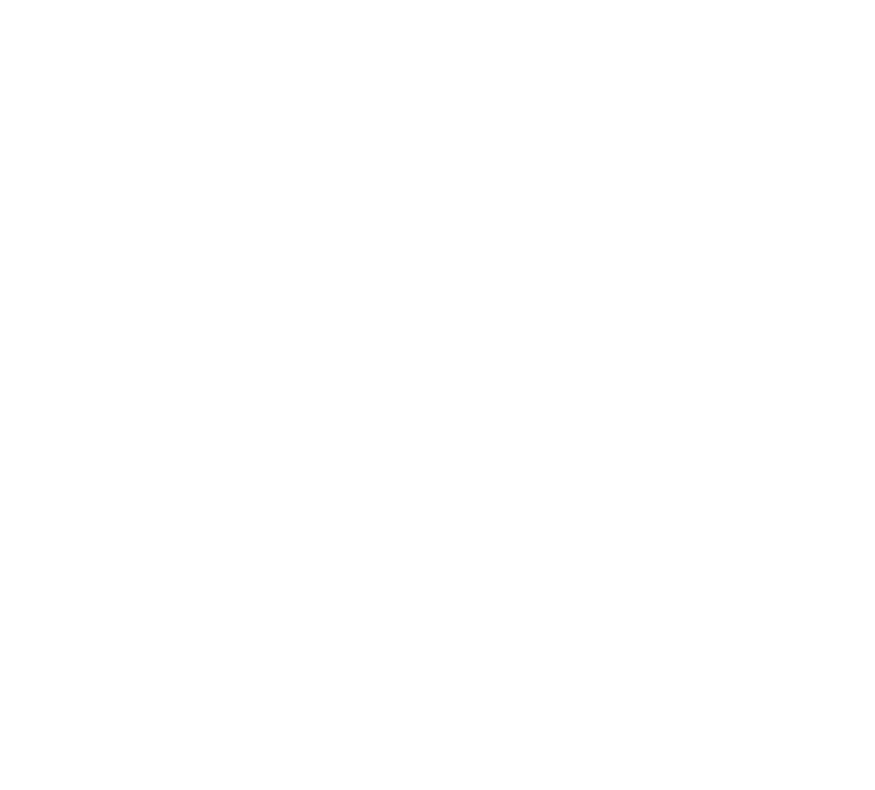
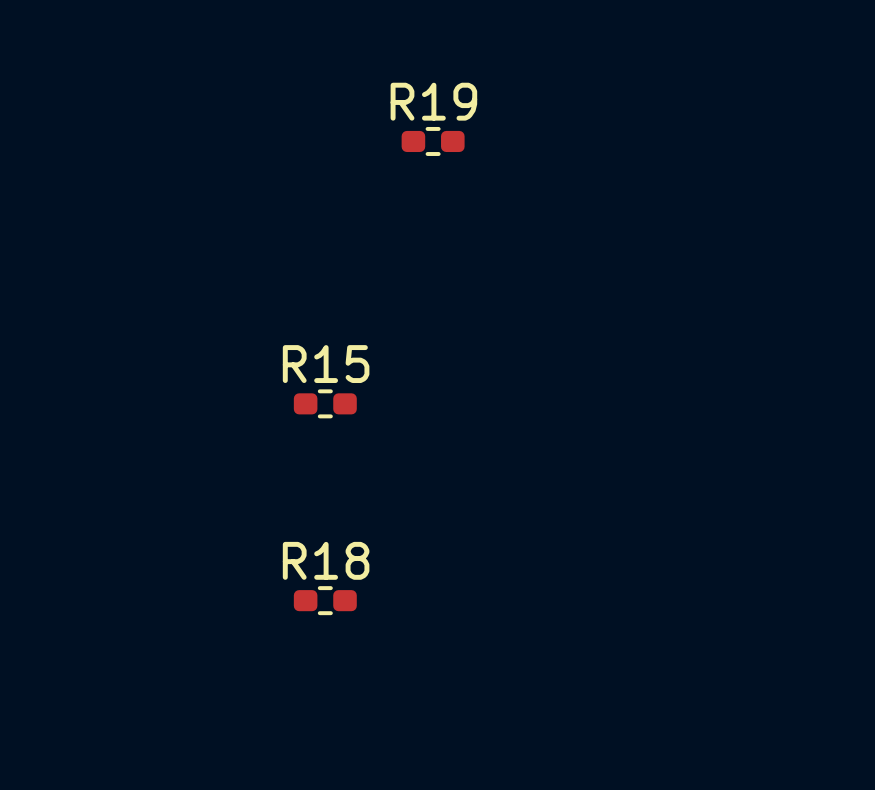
R19: none -> (433, 141)
R15: none -> (325, 403)
R18: none -> (325, 600)

